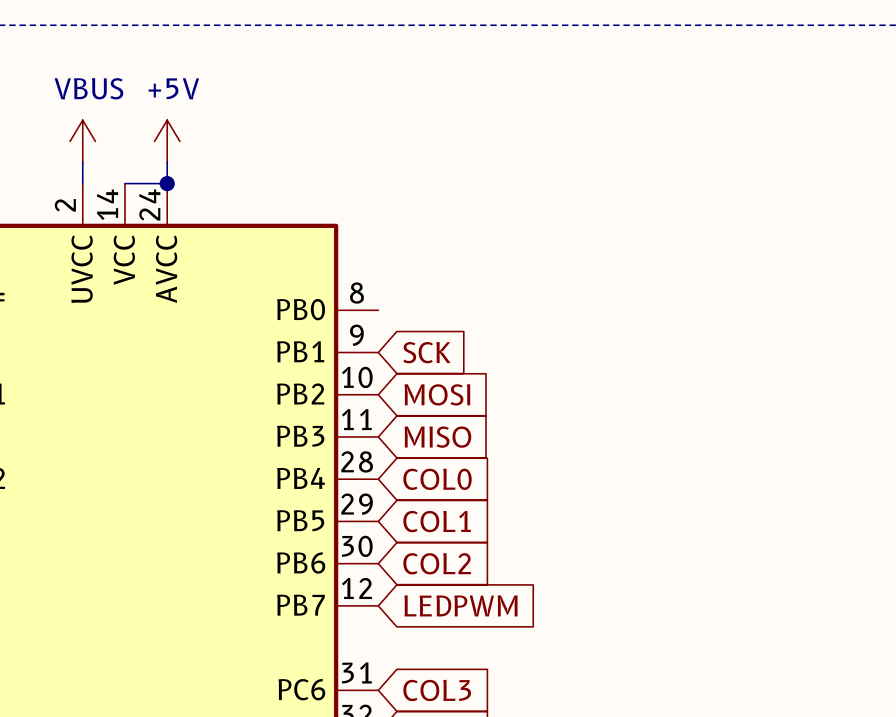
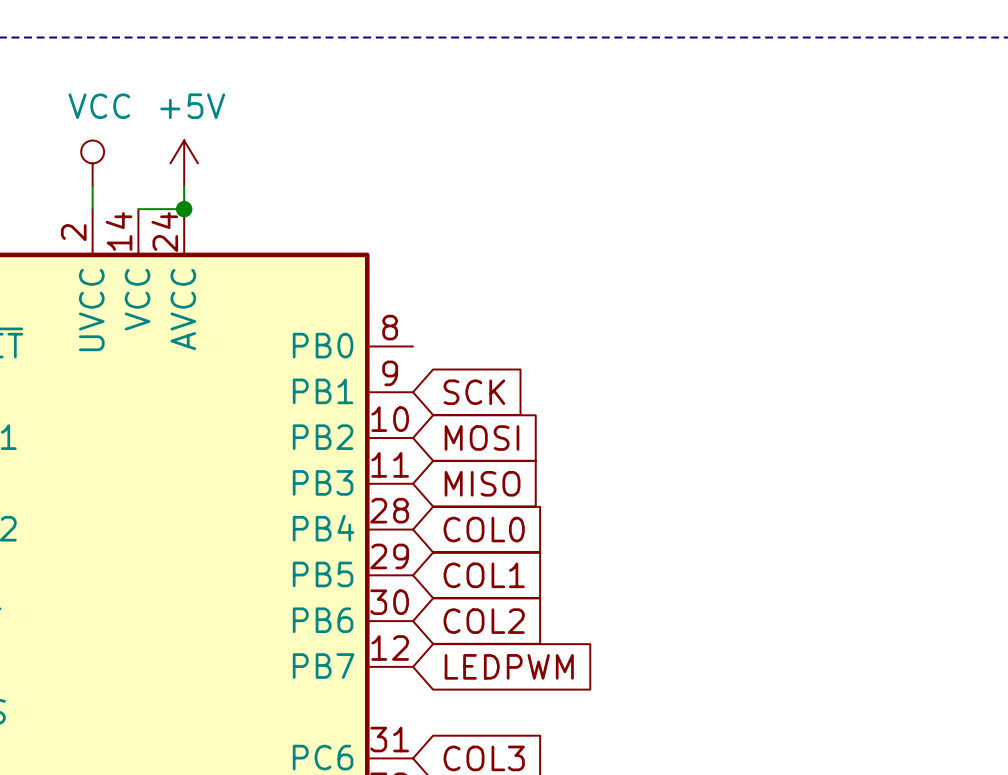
power symbol: VBUS (82, 141) -> VCC (92, 163)

